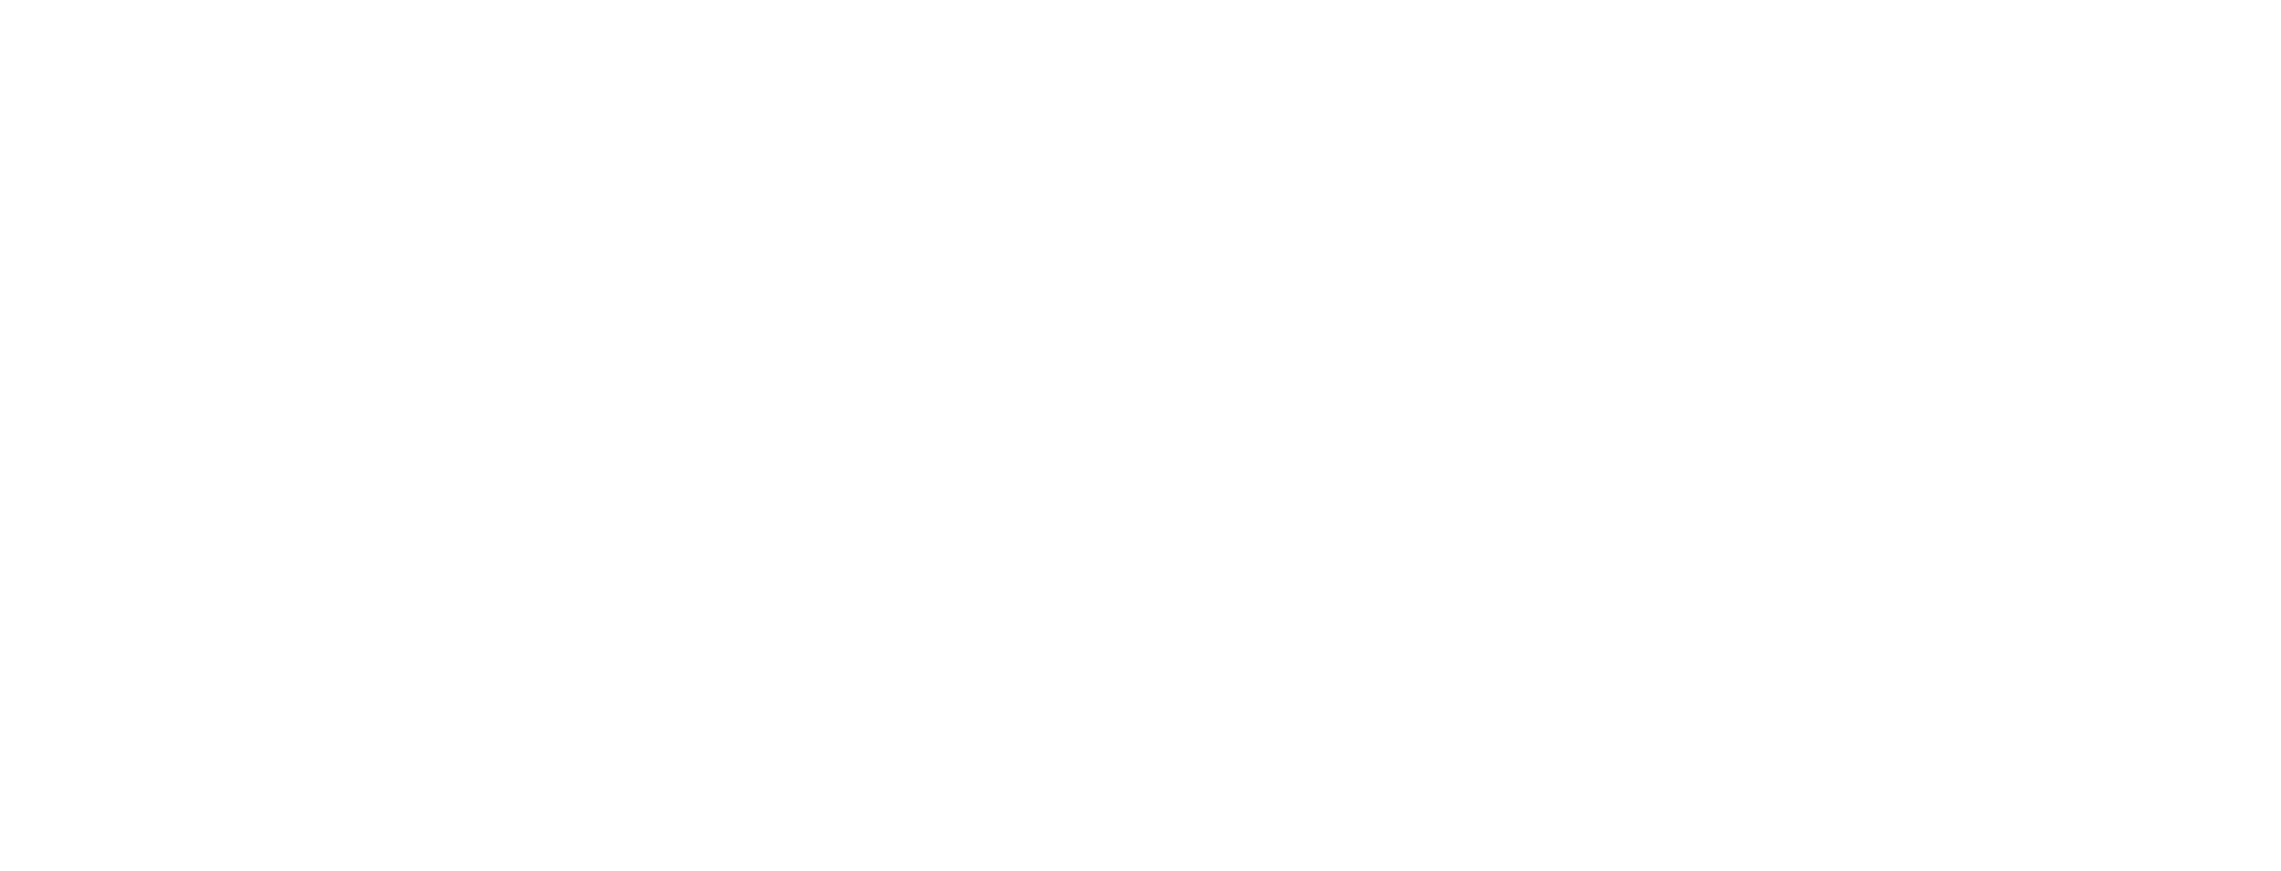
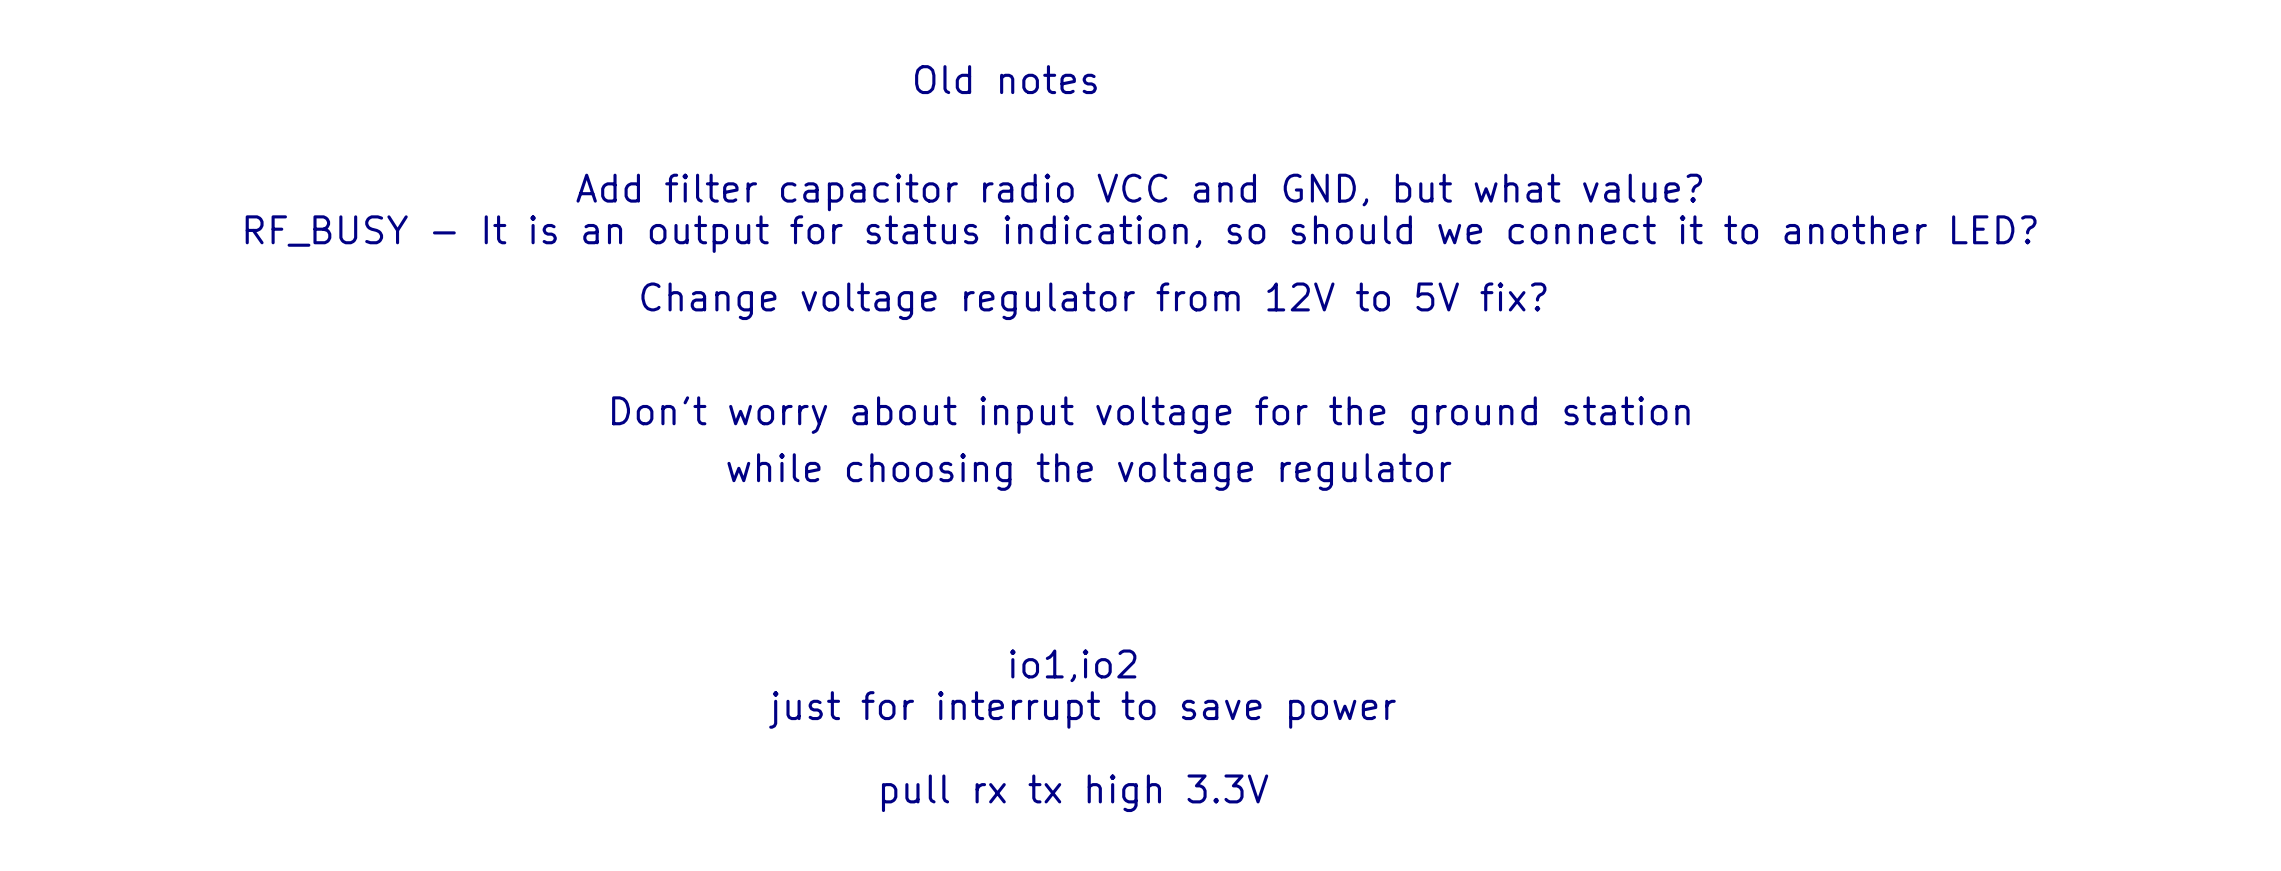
text: none -> Old notes (1005, 79)
text: none -> Add filter capacitor radio VCC and GND, but what value? (1139, 192)
text: none -> RF_BUSY - It is an output for status indication, so should we connect it to another LED? (1141, 234)
text: none -> Change voltage regulator from 12V to 5V fix? (1093, 301)
text: none -> Don't worry about input voltage for the ground station (1150, 415)
text: none -> while choosing the voltage regulator (1089, 472)
text: none -> io1,io2 (1073, 665)
text: none -> just for interrupt to save power (1082, 709)
text: none -> pull rx tx high 3.3V (1075, 793)

